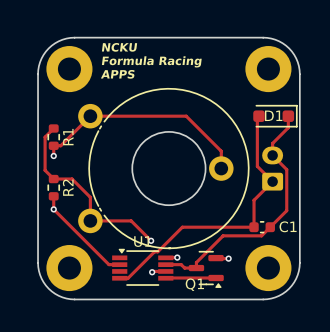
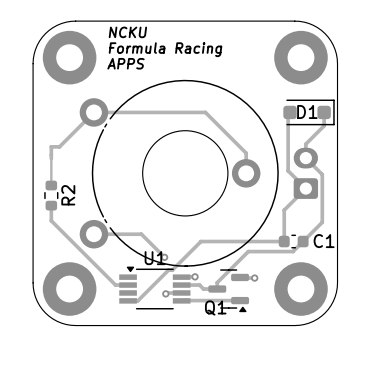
track: (53, 128) (45, 137) (45, 170) (53, 179) (72, 179) (90, 197) (90, 220) -> none
R1: (53, 137) -> none
track: none -> (51, 158) (51, 185)
via: (53, 155) -> none
via: (53, 209) -> none

